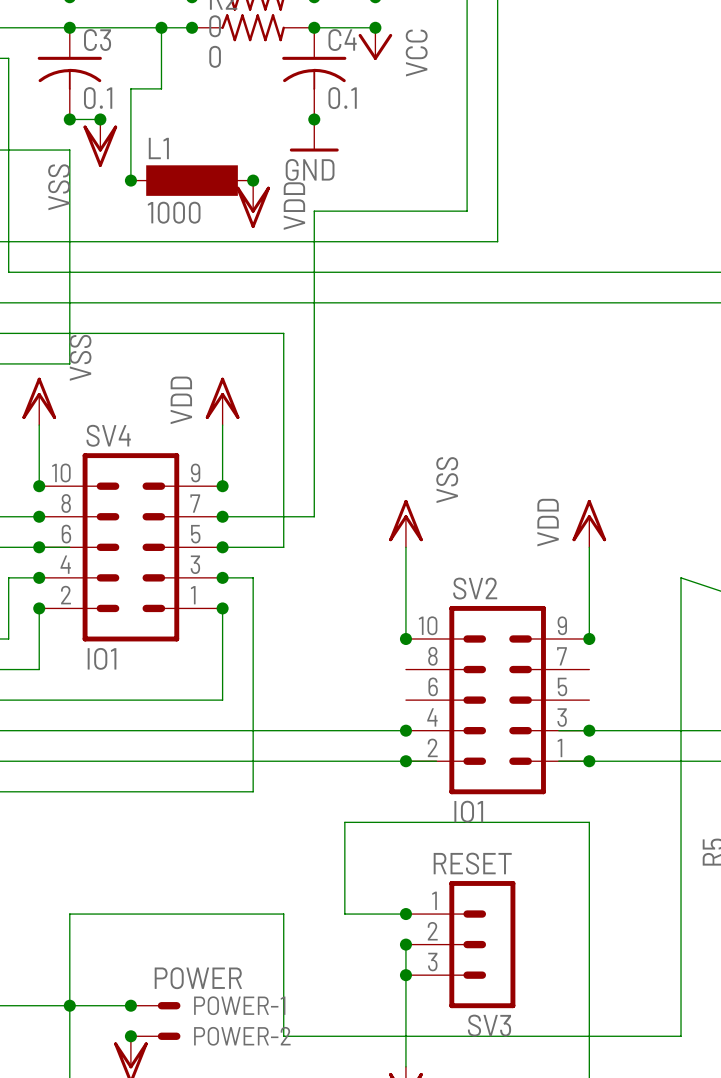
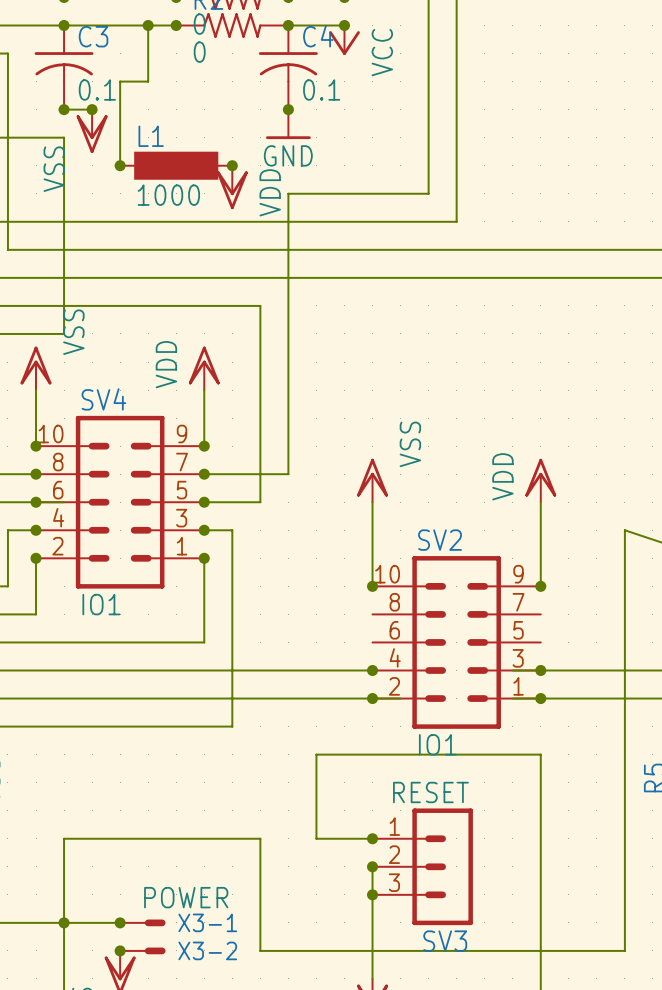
POWER-1 name: POWER-1 (239, 1005) -> X3-1 (207, 922)
POWER-2 name: POWER-2 (242, 1036) -> X3-2 (207, 950)

